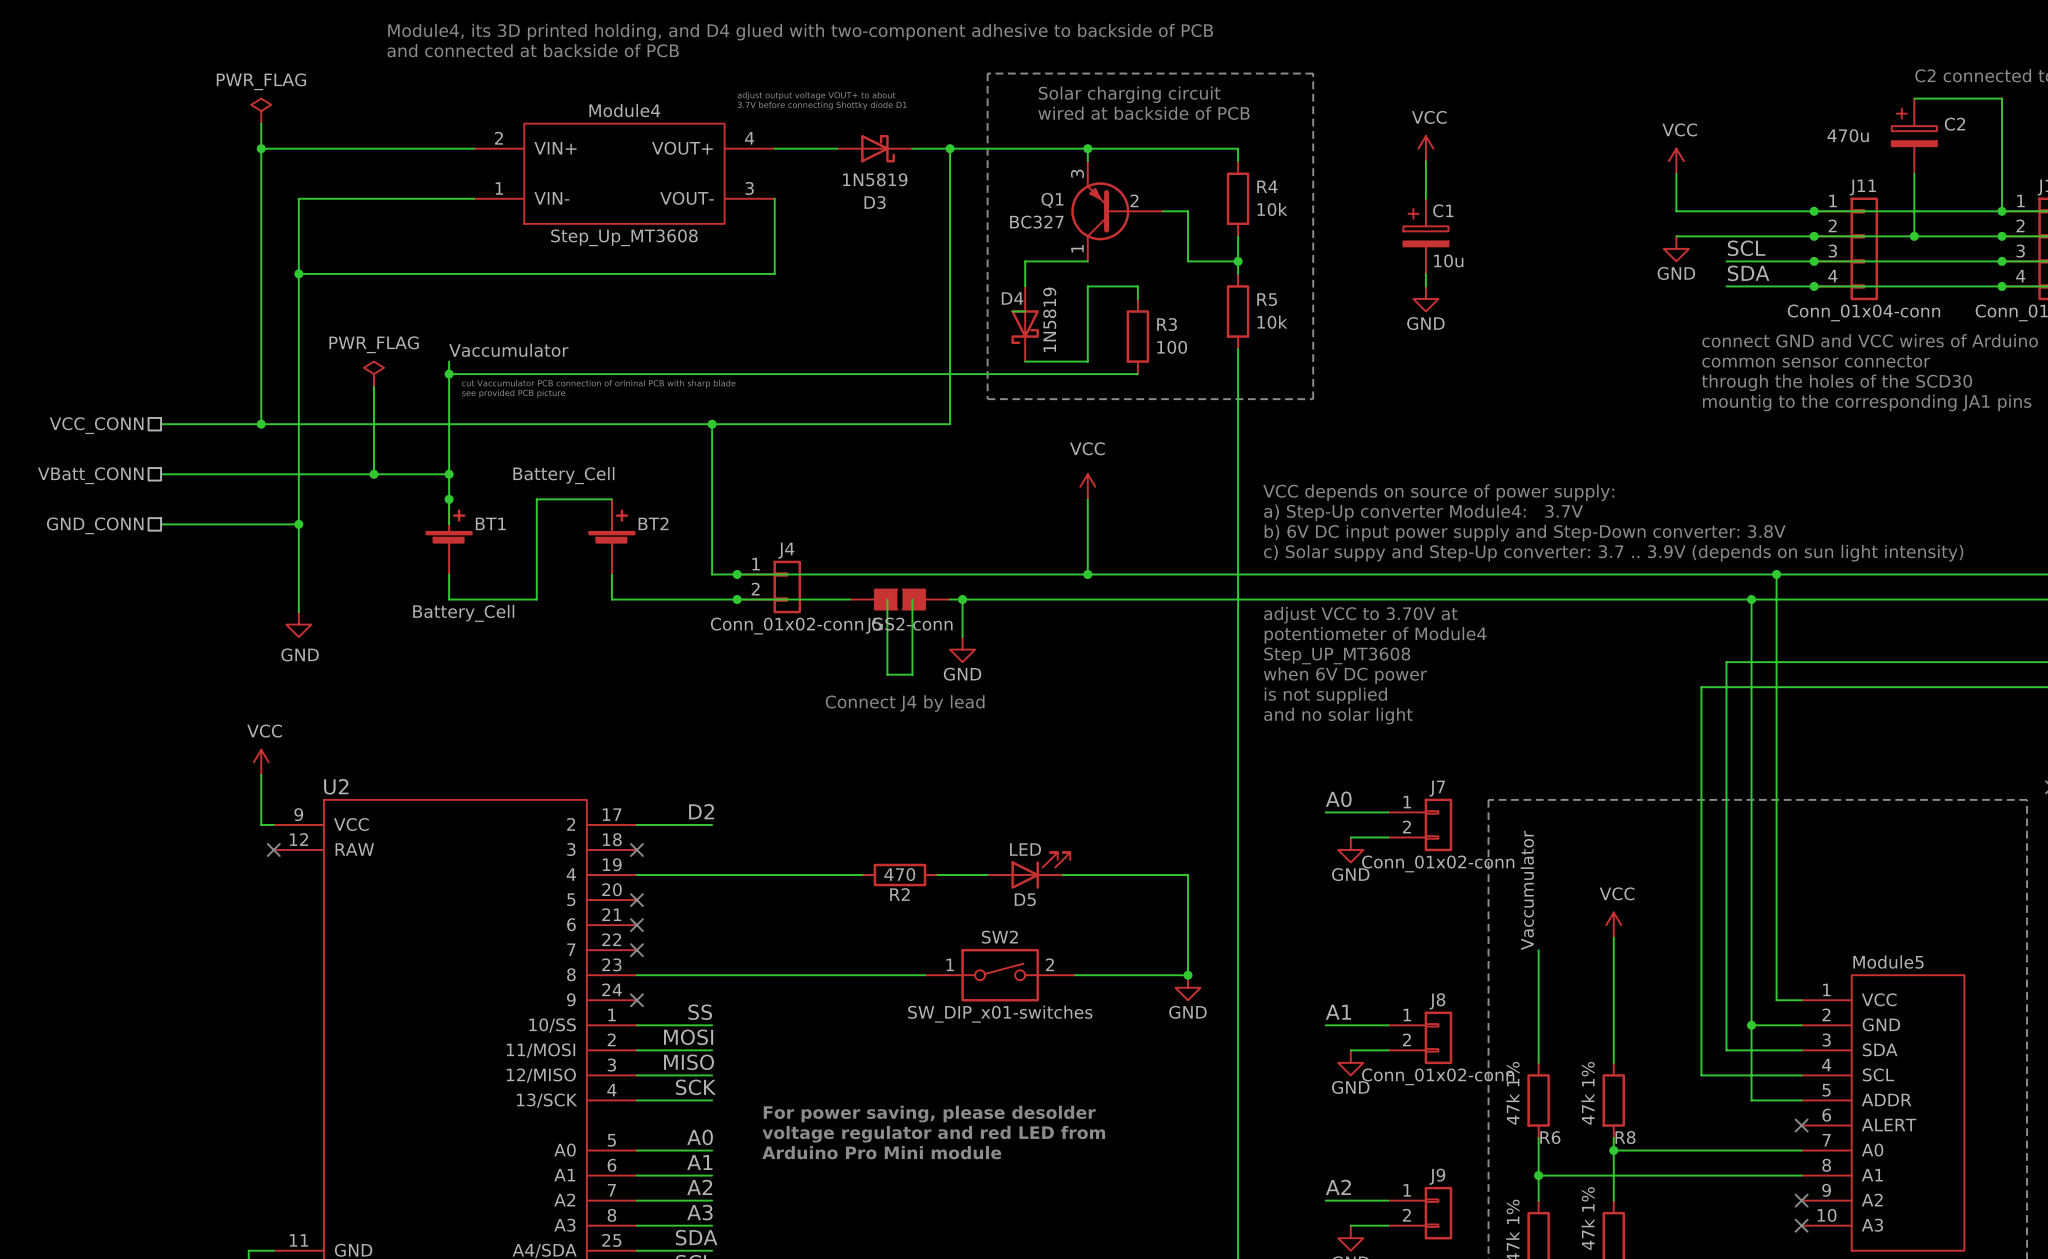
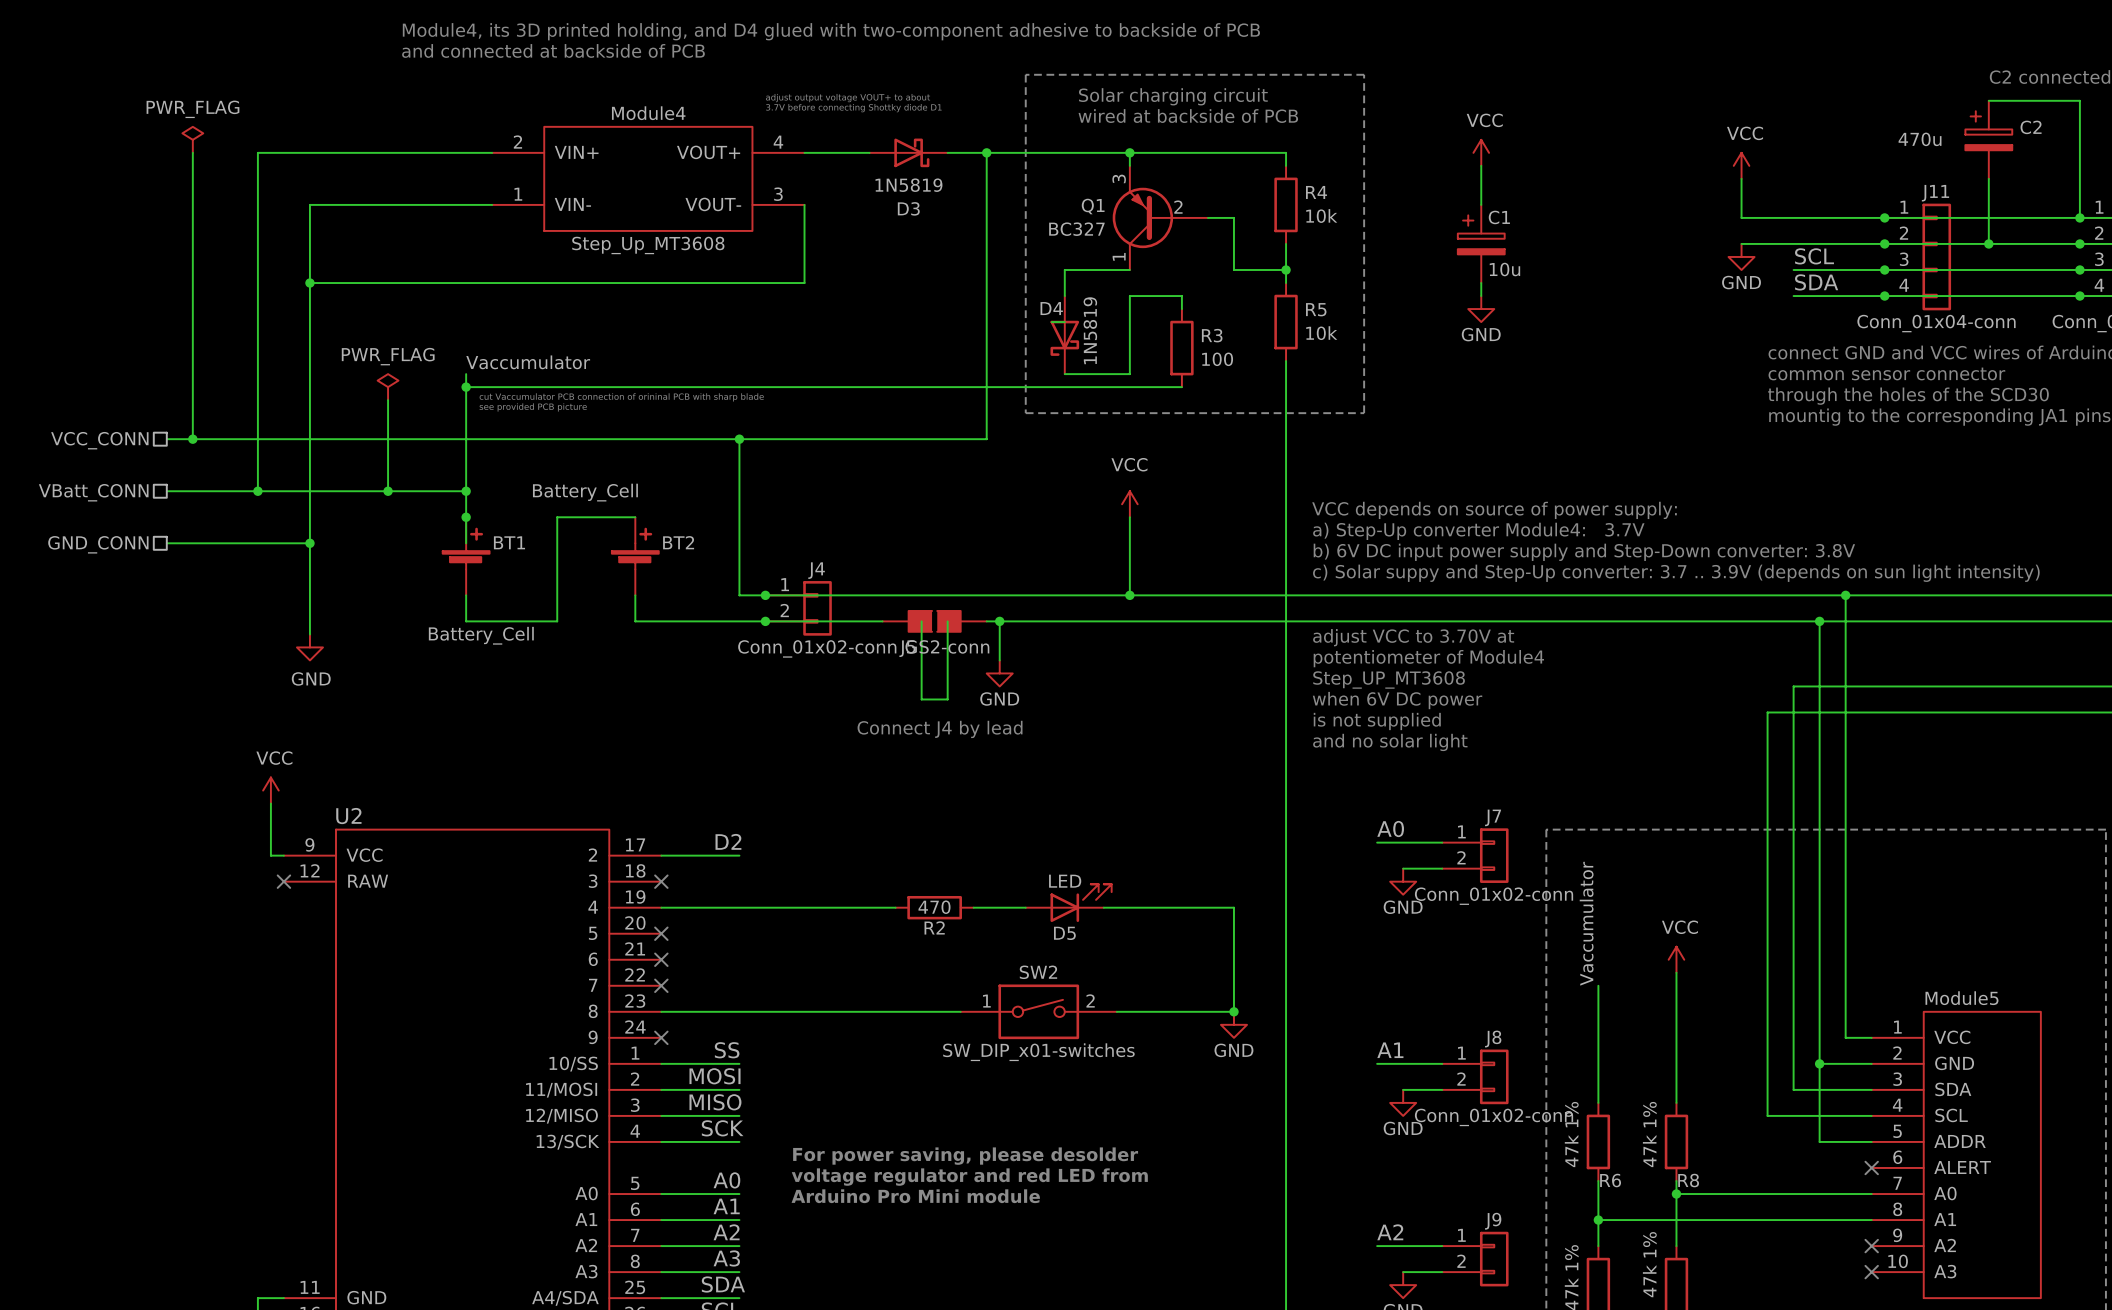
power symbol position: PWR_FLAG (261, 111) -> PWR_FLAG (192, 139)
wire: (261, 123) (261, 424) -> none
wire: none -> (192, 152) (192, 439)
wire: none -> (270, 152) (257, 152) (257, 491)
junction: (261, 148) -> none
junction: none -> (192, 439)
junction: (261, 424) -> none
junction: none -> (257, 491)

